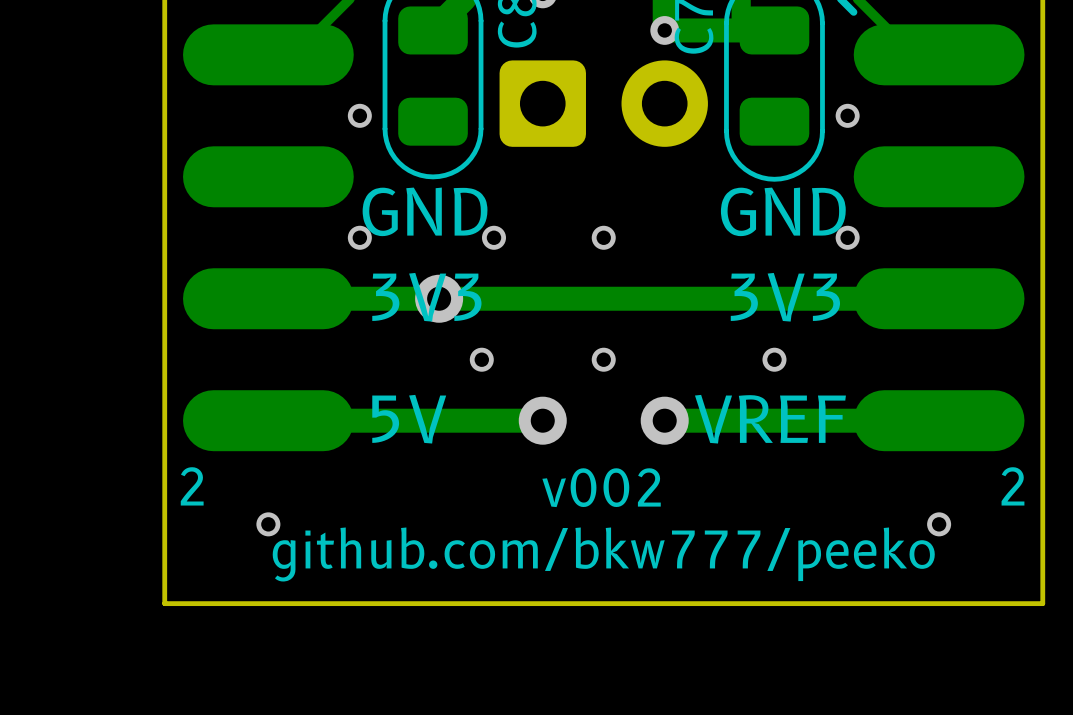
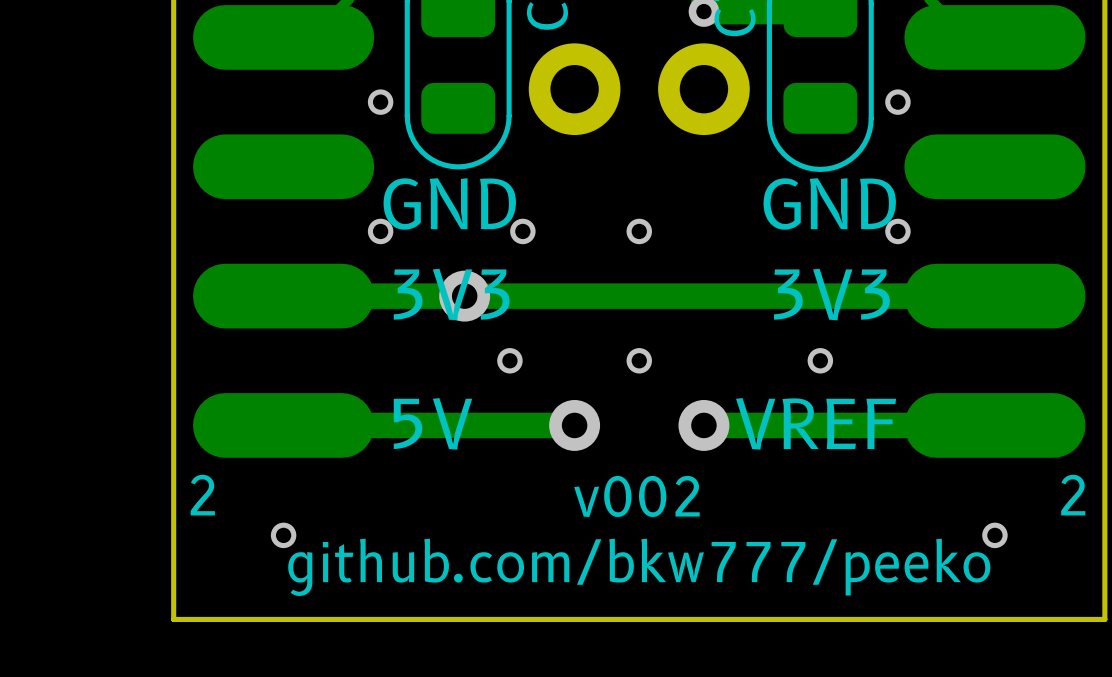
part footprint: [499, 60, 708, 147] -> [528, 43, 750, 136]

